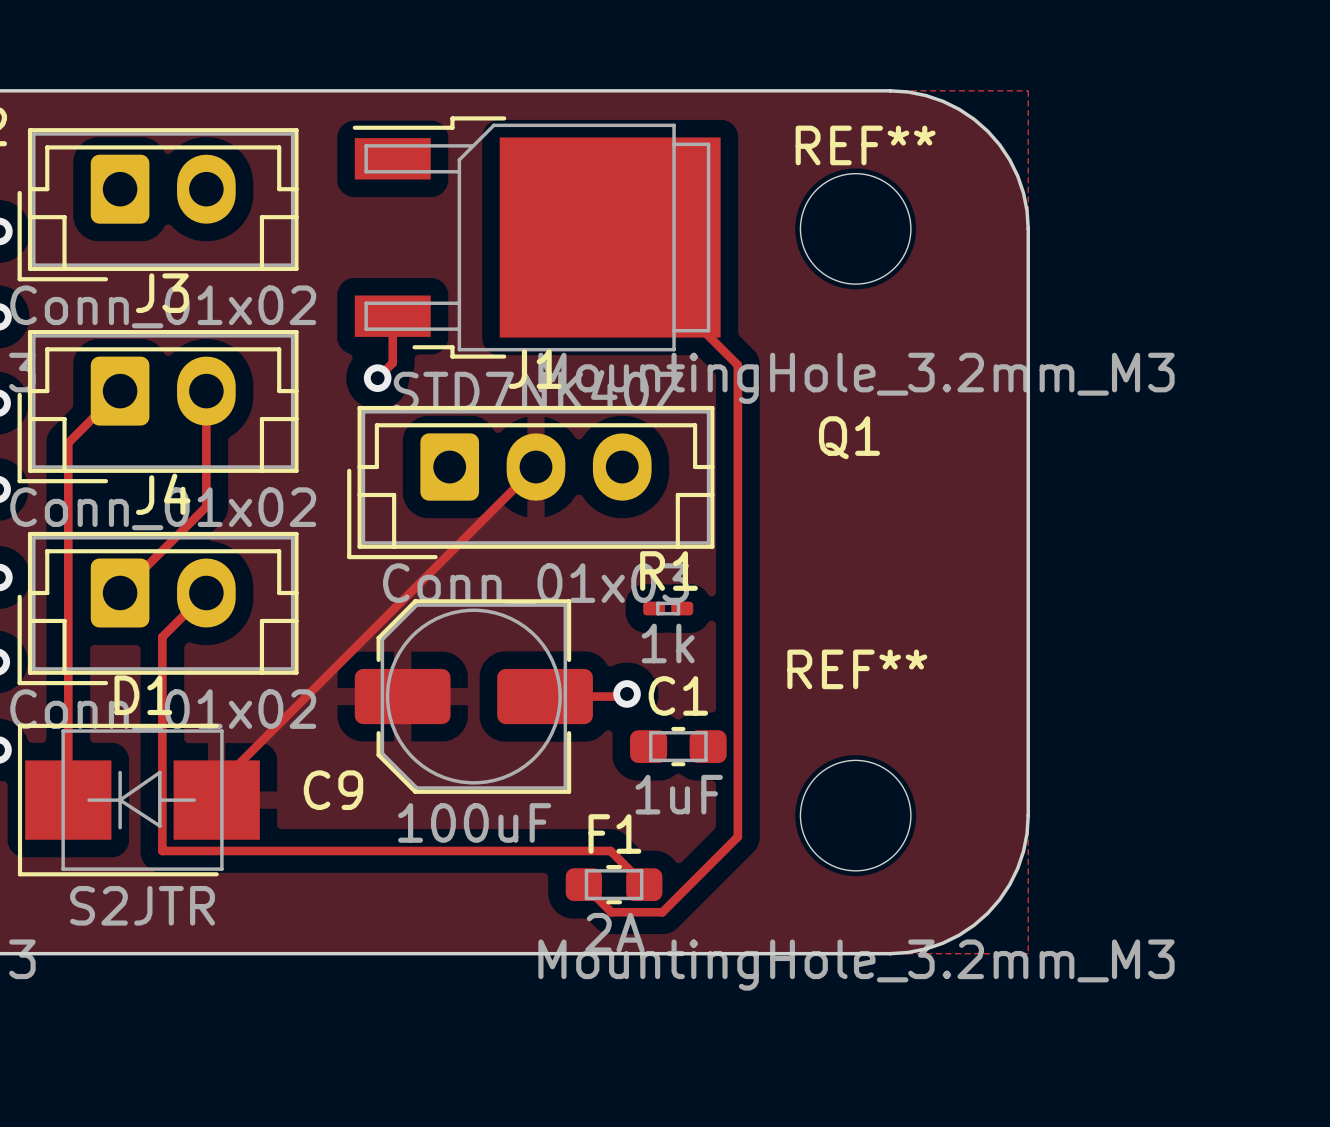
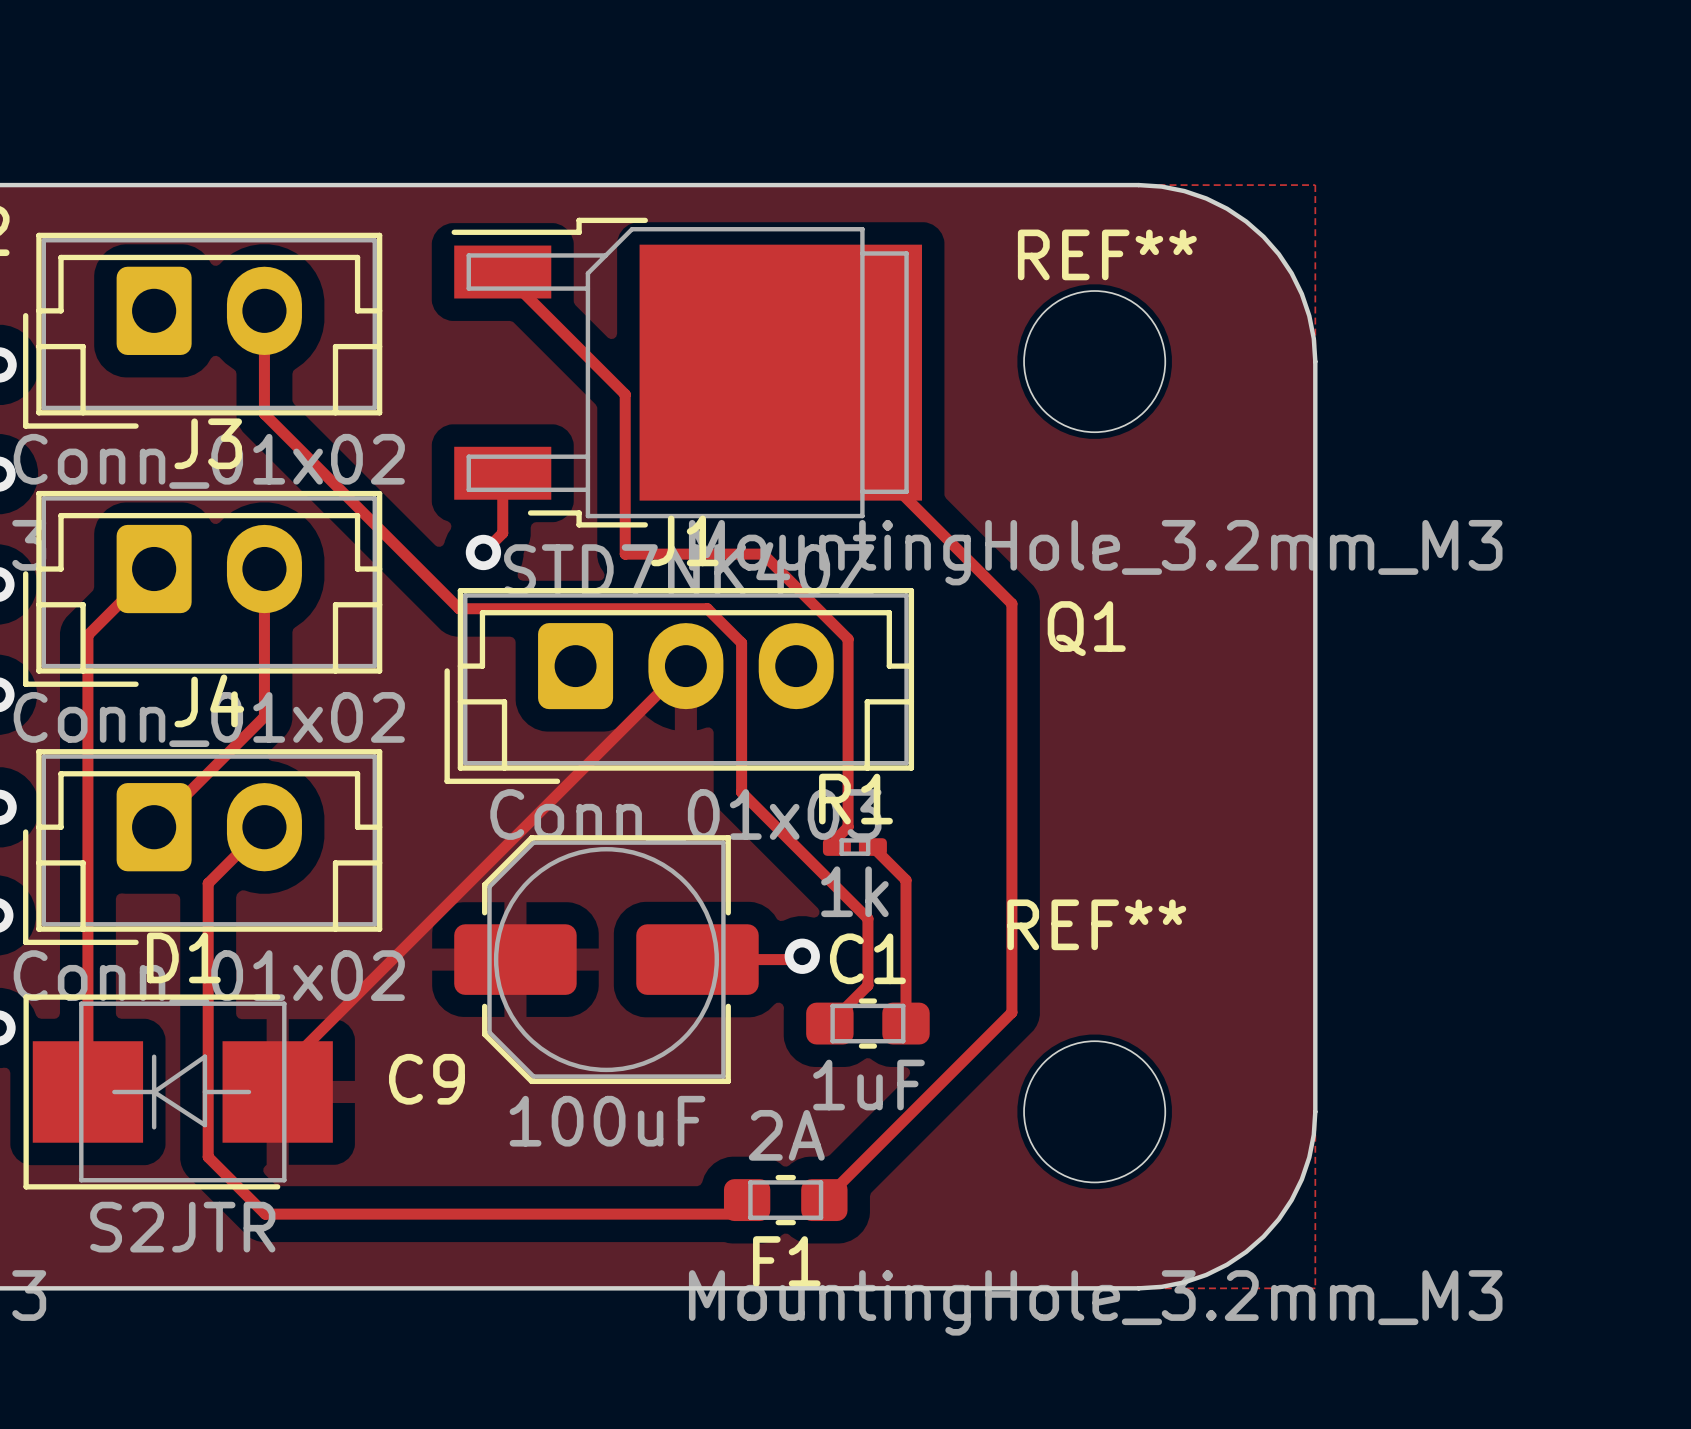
track: none -> (502, 272) (625, 394) (625, 554) (763, 554) (848, 639) (848, 827) (836, 838) (836, 847)
track: none -> (264, 310) (264, 414) (459, 608) (707, 608) (741, 642) (741, 792) (867, 918) (867, 985) (829, 1023)
track: (737, 365) (737, 836) (662, 912) (611, 912) (583, 884) -> (944, 535) (1011, 603) (1011, 1012) (824, 1200)
track: none -> (872, 847) (906, 880) (906, 1023)
F1 name position: F1 (614, 834) -> F1 (786, 1261)
track: (162, 850) (610, 850) (644, 884) -> (208, 1157) (265, 1214) (733, 1214)
F1 value position: 2A (614, 932) -> 2A (786, 1135)

